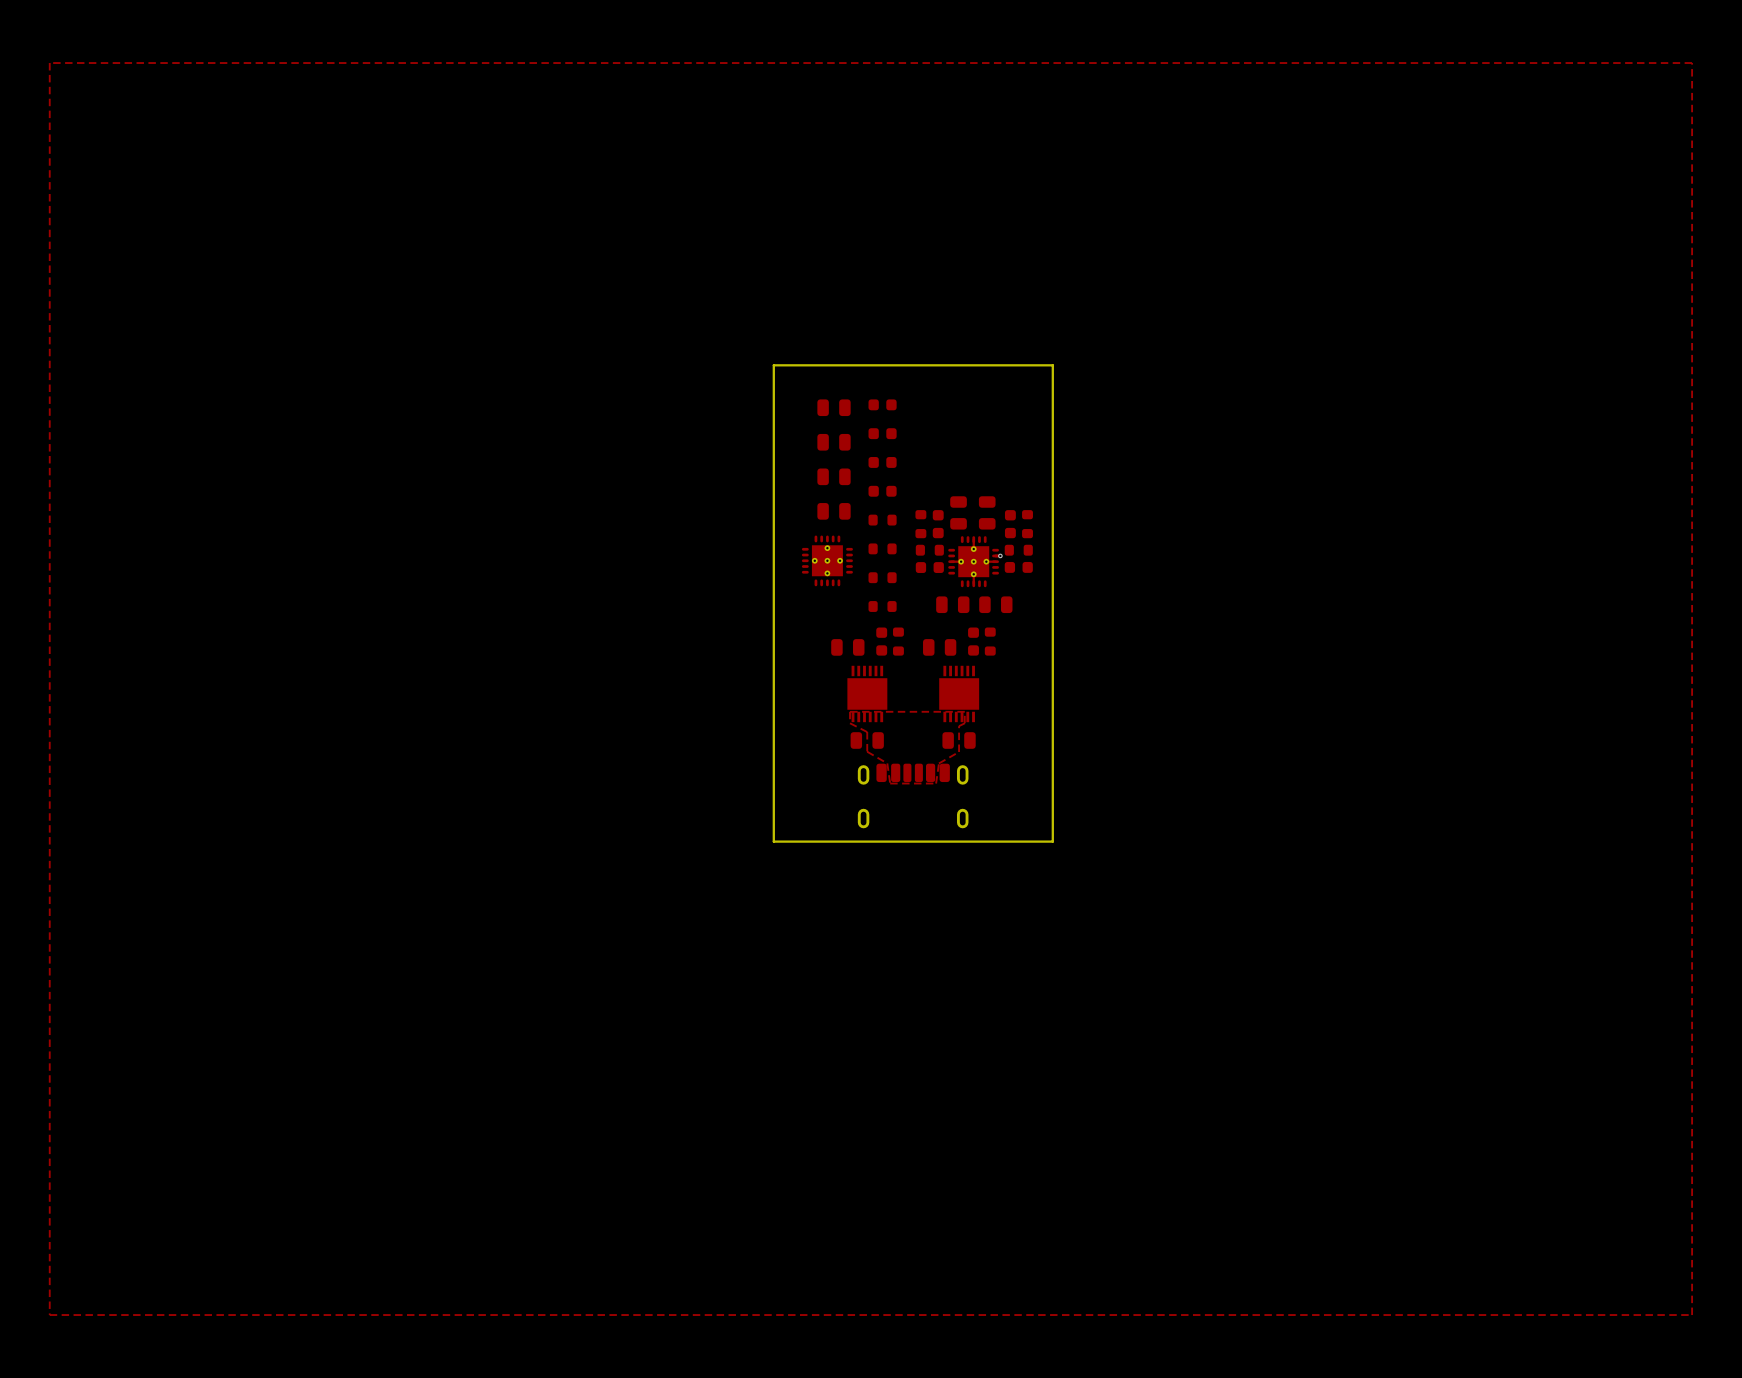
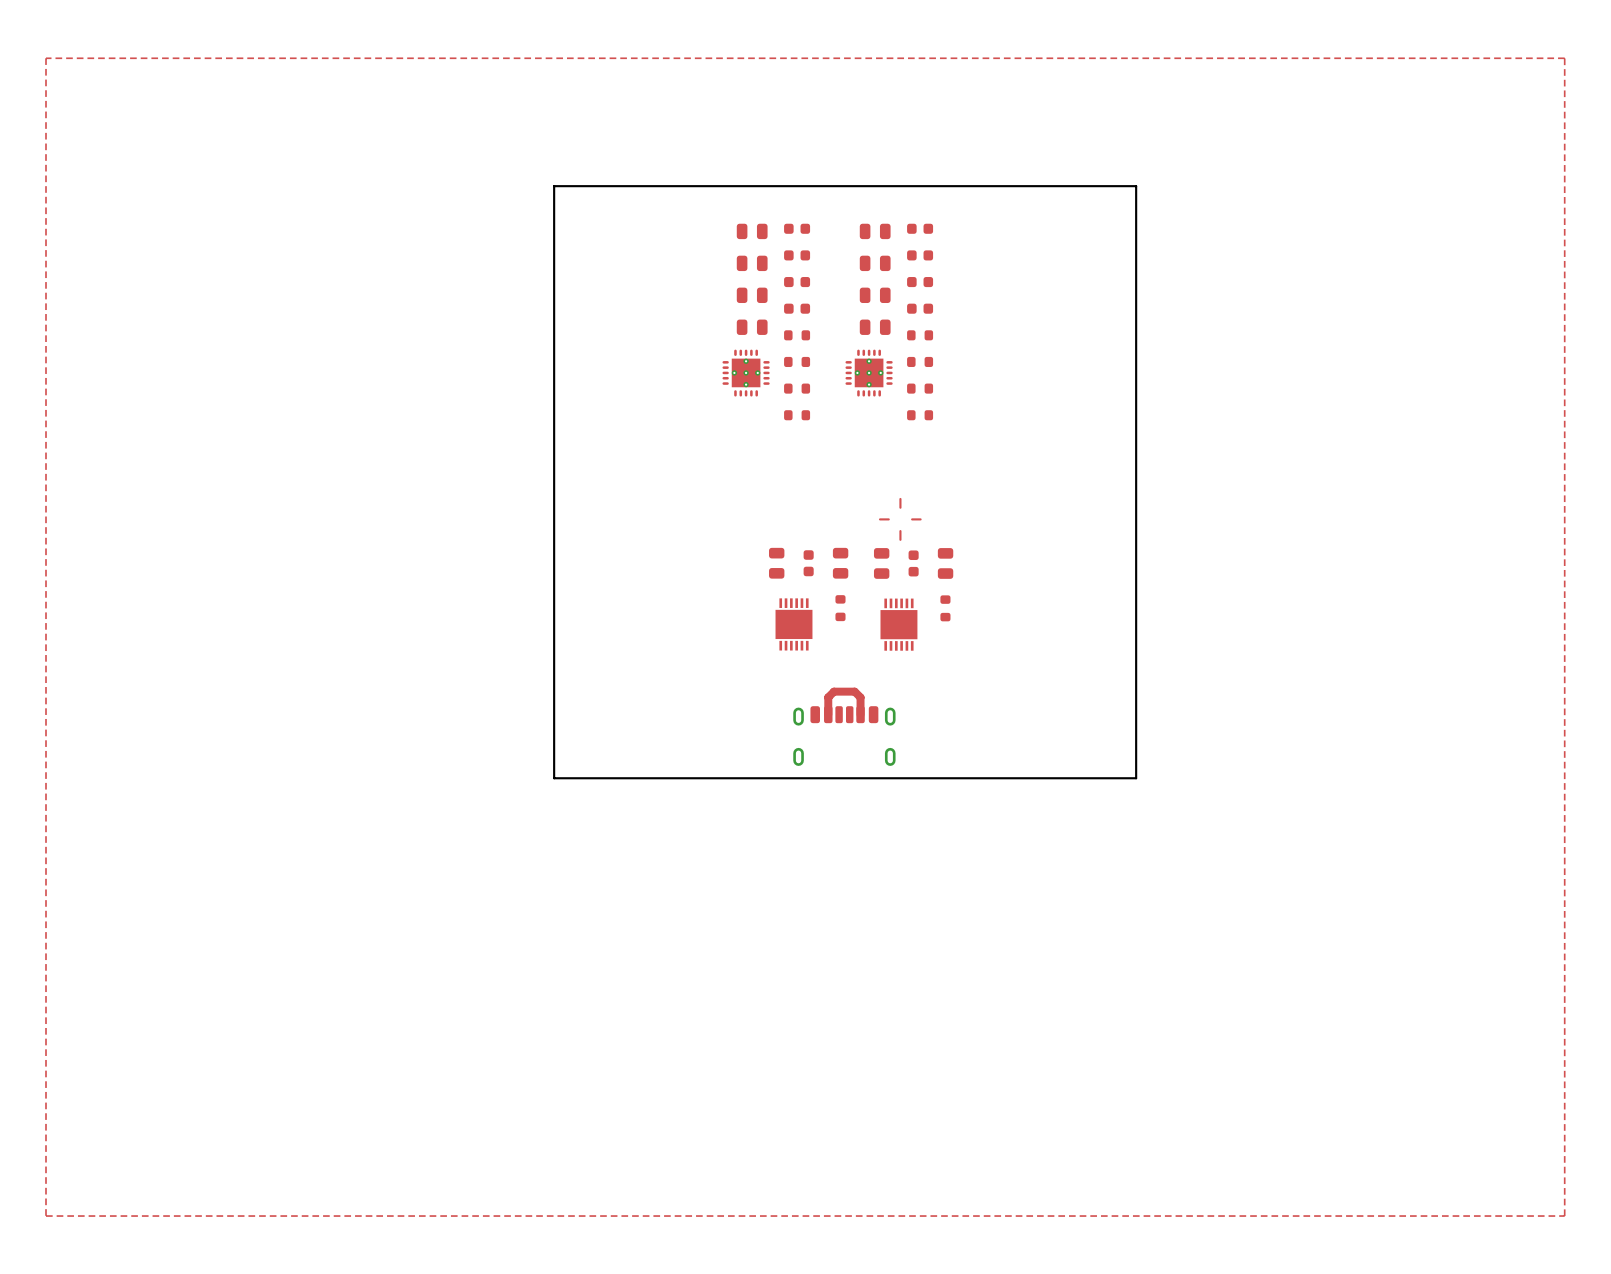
part: none -> (797, 228)
part: none -> (920, 228)
part: none -> (752, 231)
part: none -> (875, 231)
part: none -> (797, 255)
part: none -> (920, 255)
part: none -> (752, 263)
part: none -> (875, 263)
part: none -> (797, 282)
part: none -> (920, 282)
part: none -> (752, 295)
part: none -> (875, 295)
part: none -> (797, 308)
part: none -> (920, 308)
part: none -> (752, 327)
part: none -> (875, 327)
part: none -> (797, 335)
part: none -> (920, 335)
part: none -> (797, 361)
part: none -> (920, 361)
part: none -> (746, 373)
part: none -> (869, 373)
part: (882, 404) -> none
part: (834, 407) -> none
part: none -> (797, 388)
part: none -> (920, 388)
part: (882, 433) -> none
part: (834, 442) -> none
part: none -> (797, 415)
part: none -> (920, 415)
part: (882, 462) -> none
part: (834, 476) -> none
part: (882, 491) -> none
part: (834, 511) -> none
part: (958, 512) -> none
part: (987, 512) -> none
part: (882, 520) -> none
part: (920, 524) -> none
part: (938, 524) -> none
part: (1010, 524) -> none
part: (1027, 524) -> none
part: (882, 548) -> none
part: (929, 550) -> none
part: (1018, 550) -> none
via: (1000, 555) -> none
part: (827, 560) -> none
part: (973, 561) -> none
part: (929, 567) -> none
part: (1018, 567) -> none
part: (882, 577) -> none
part footprint: [979, 596, 1013, 614] -> [908, 550, 919, 577]
part footprint: [868, 601, 897, 612] -> [803, 550, 814, 577]
part rotation: 0° (952, 604) -> 90° clockwise (881, 563)
part: none -> (776, 563)
part: none -> (840, 563)
part: none -> (945, 563)
part: (881, 641) -> none
part position: (898, 641) -> (840, 608)
part: (973, 641) -> none
part position: (990, 641) -> (945, 608)
part: (847, 647) -> none
part: (939, 647) -> none
part position: (867, 693) -> (793, 624)
part position: (959, 693) -> (898, 624)
top zone outline: (964, 711) (964, 723) (959, 726) (959, 751) (938, 763) (936, 783) (890, 783) (887, 763) (867, 751) (867, 732) (850, 723) (850, 711) (964, 711) -> none
part: (867, 740) -> none
part: (959, 740) -> none
top track: none -> (860, 714) (860, 697) (854, 691) (834, 691) (828, 697) (828, 714)
board edge: (1052, 841) (1052, 365) (773, 365) (773, 841) -> (973, 778) (1136, 778) (1136, 186) (554, 186) (554, 778) (715, 778)

